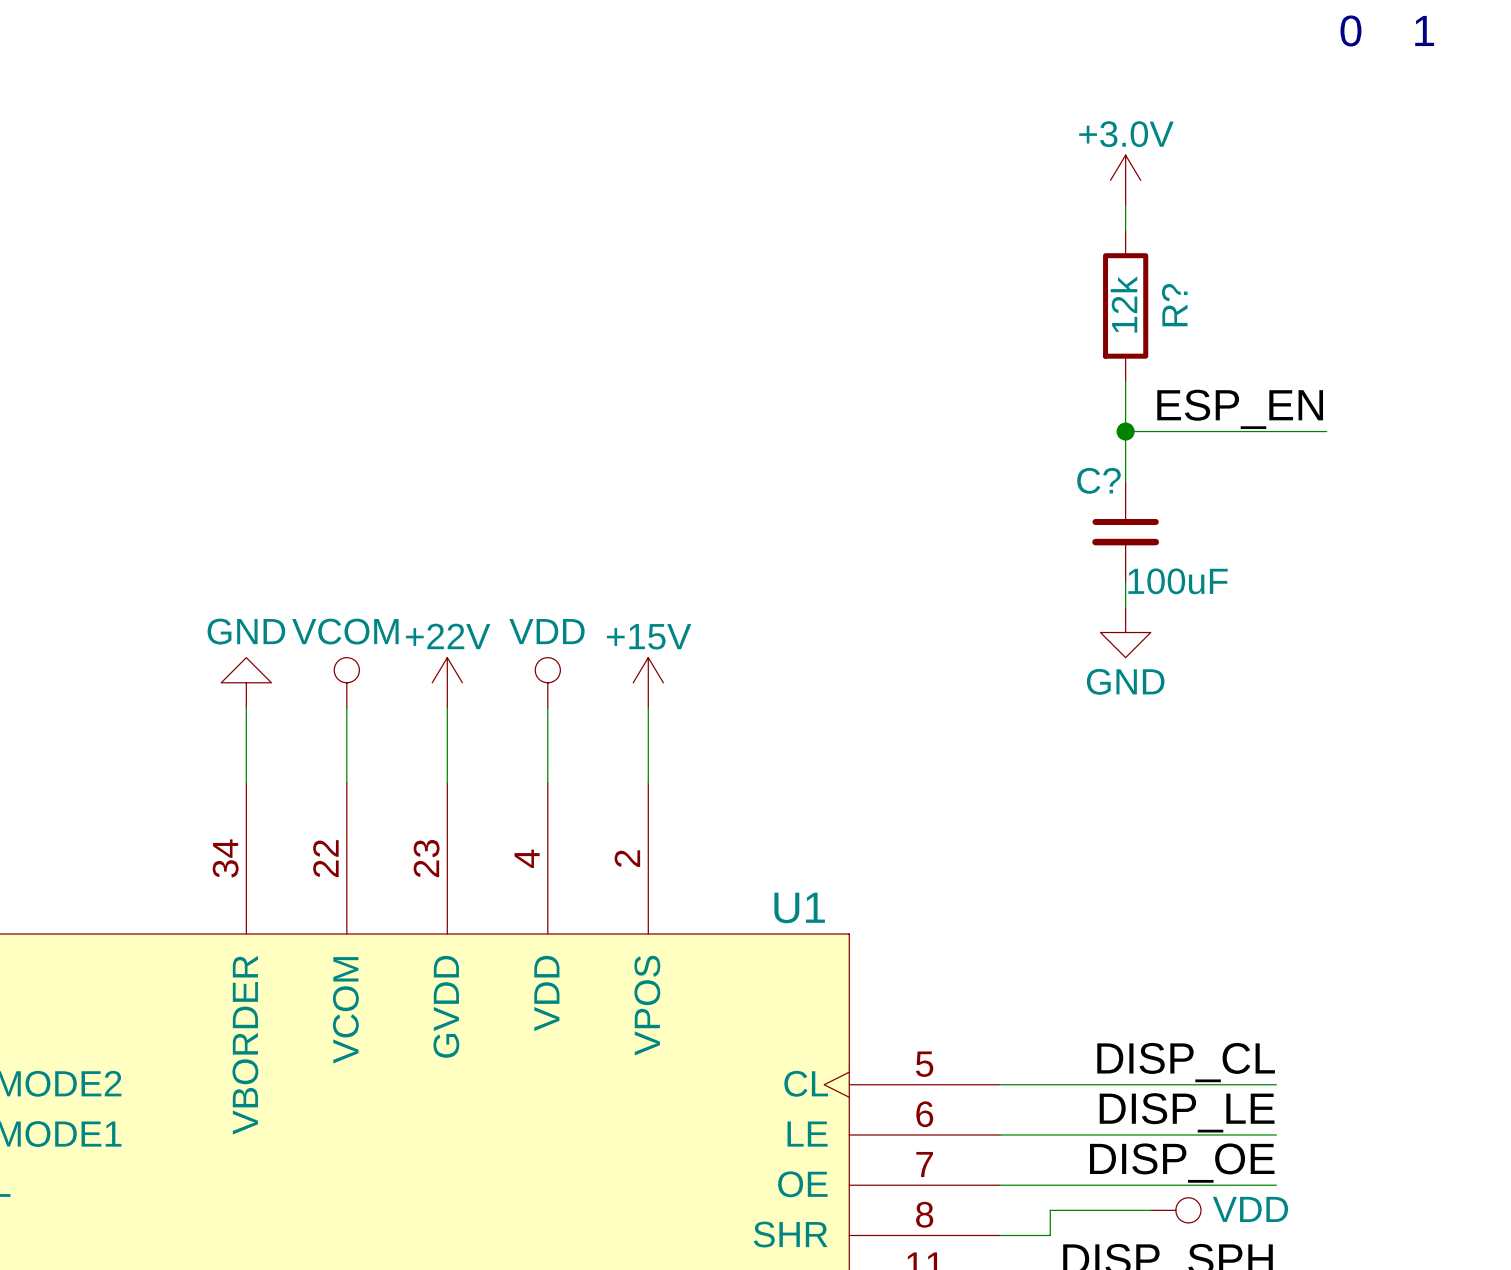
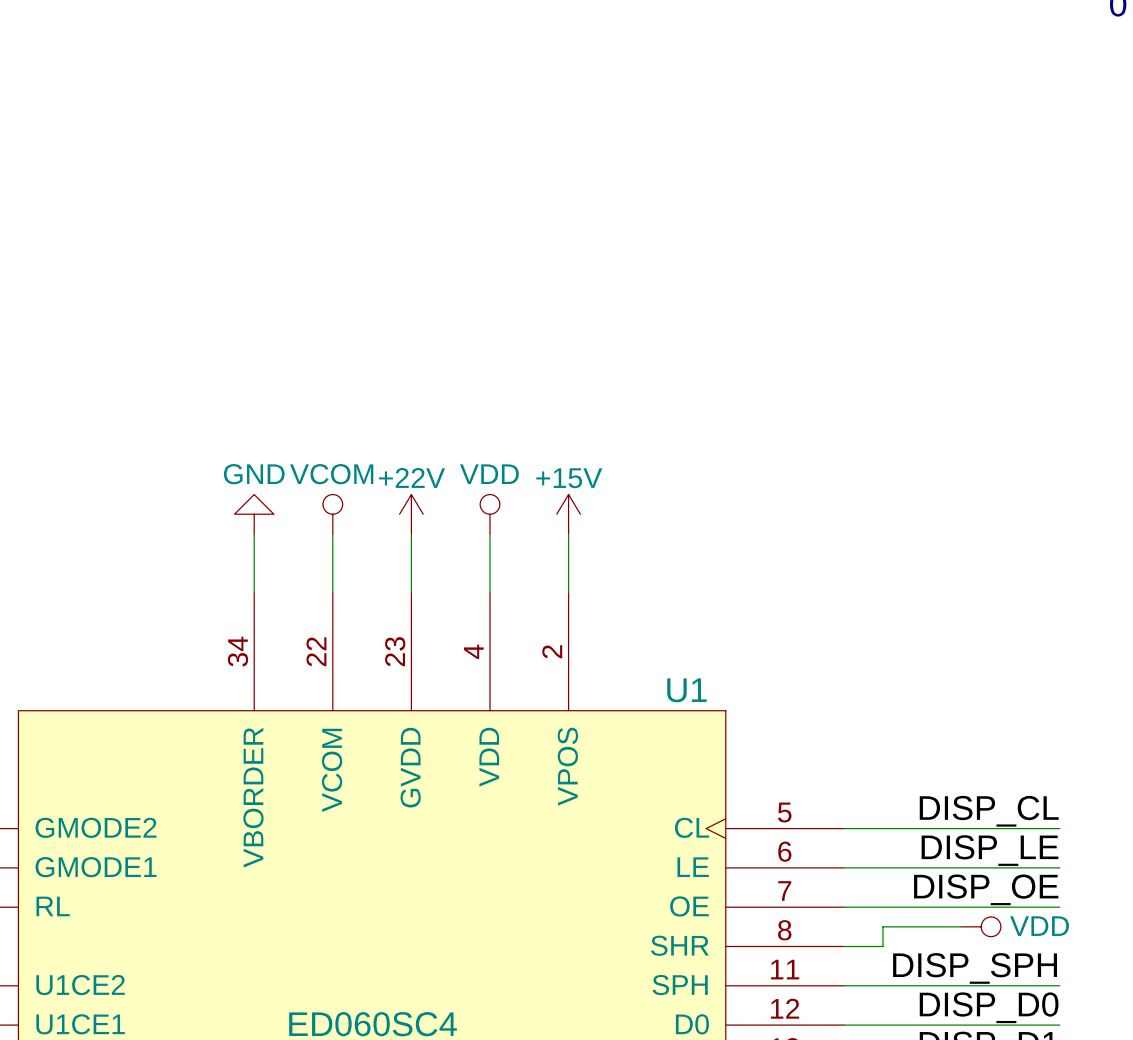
power symbol: +3.0V (1125, 180) -> none
wire: (1125, 205) (1125, 230) -> none
R?: 12k (1125, 305) -> none
wire: (1125, 381) (1125, 481) -> none
label: ESP_EN (1240, 409) -> none
wire: (1125, 431) (1326, 431) -> none
junction: (1125, 431) -> none
C?: 100uF (1125, 532) -> none
wire: (1125, 582) (1125, 607) -> none
power symbol: GND (1125, 632) -> none

